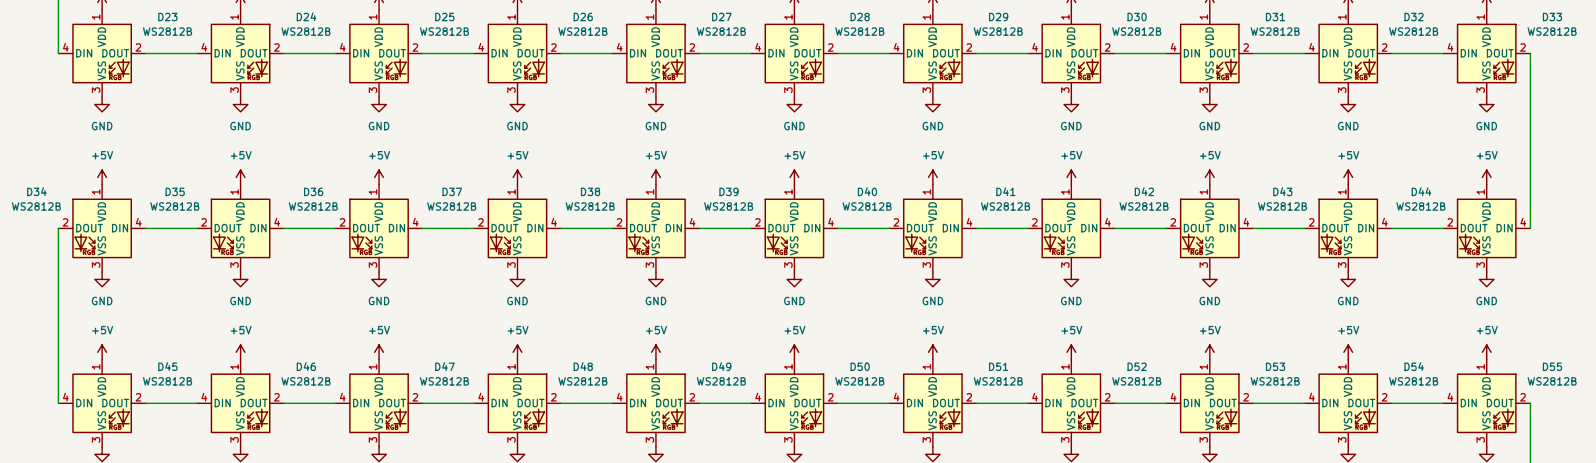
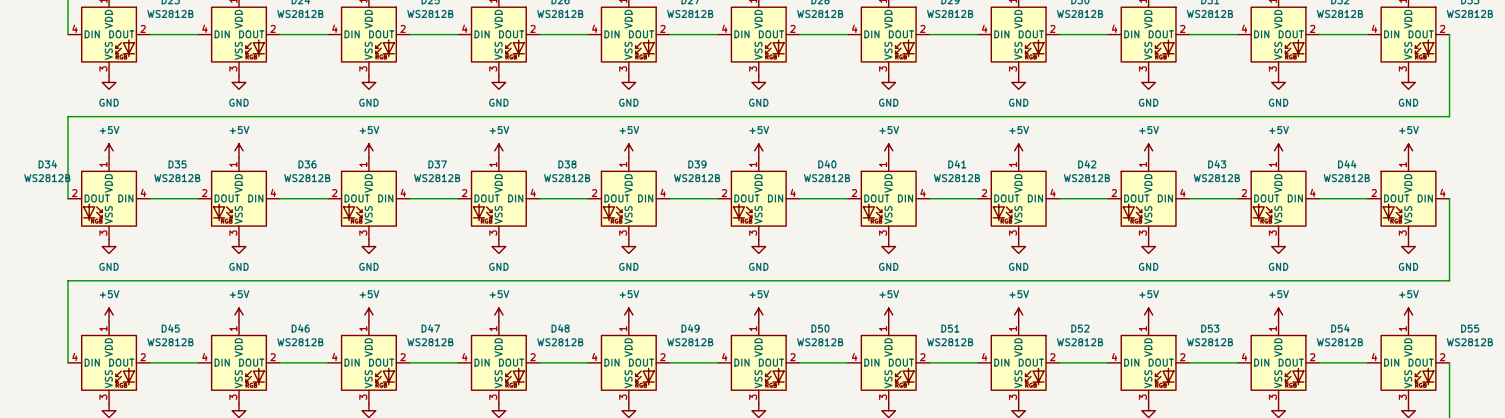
wire: (1530, 140) (1530, 228) -> (1449, 116) (68, 116) (68, 198)
wire: (58, 228) (58, 315) -> (1449, 198) (1449, 280) (68, 280)

